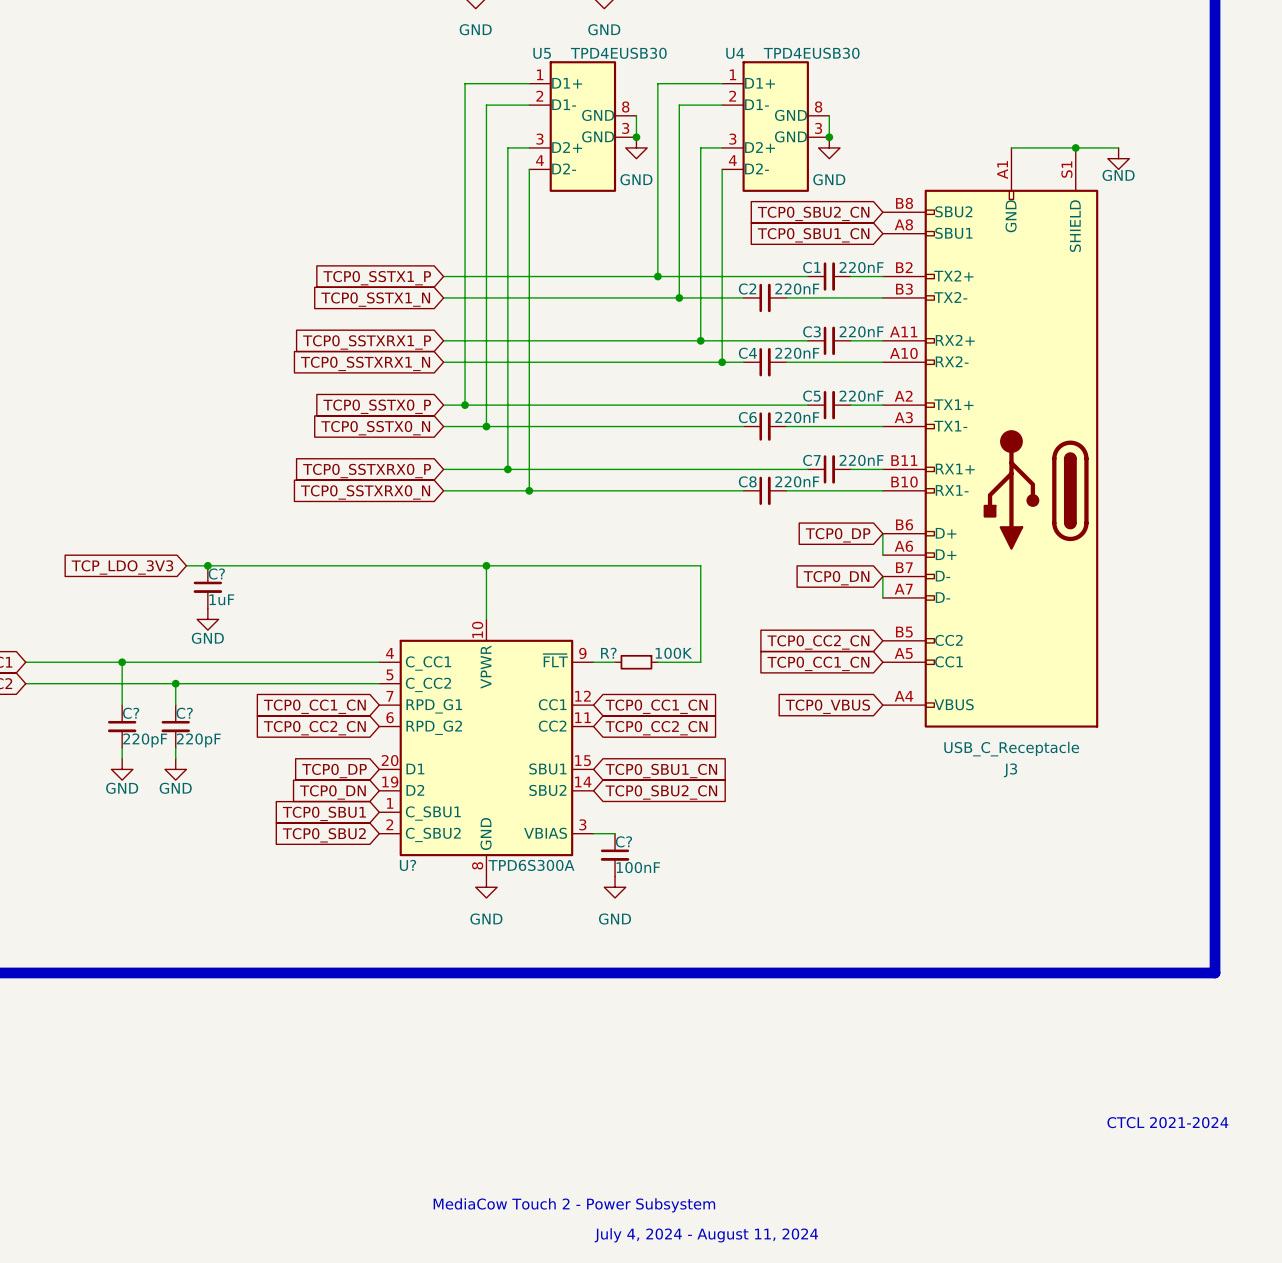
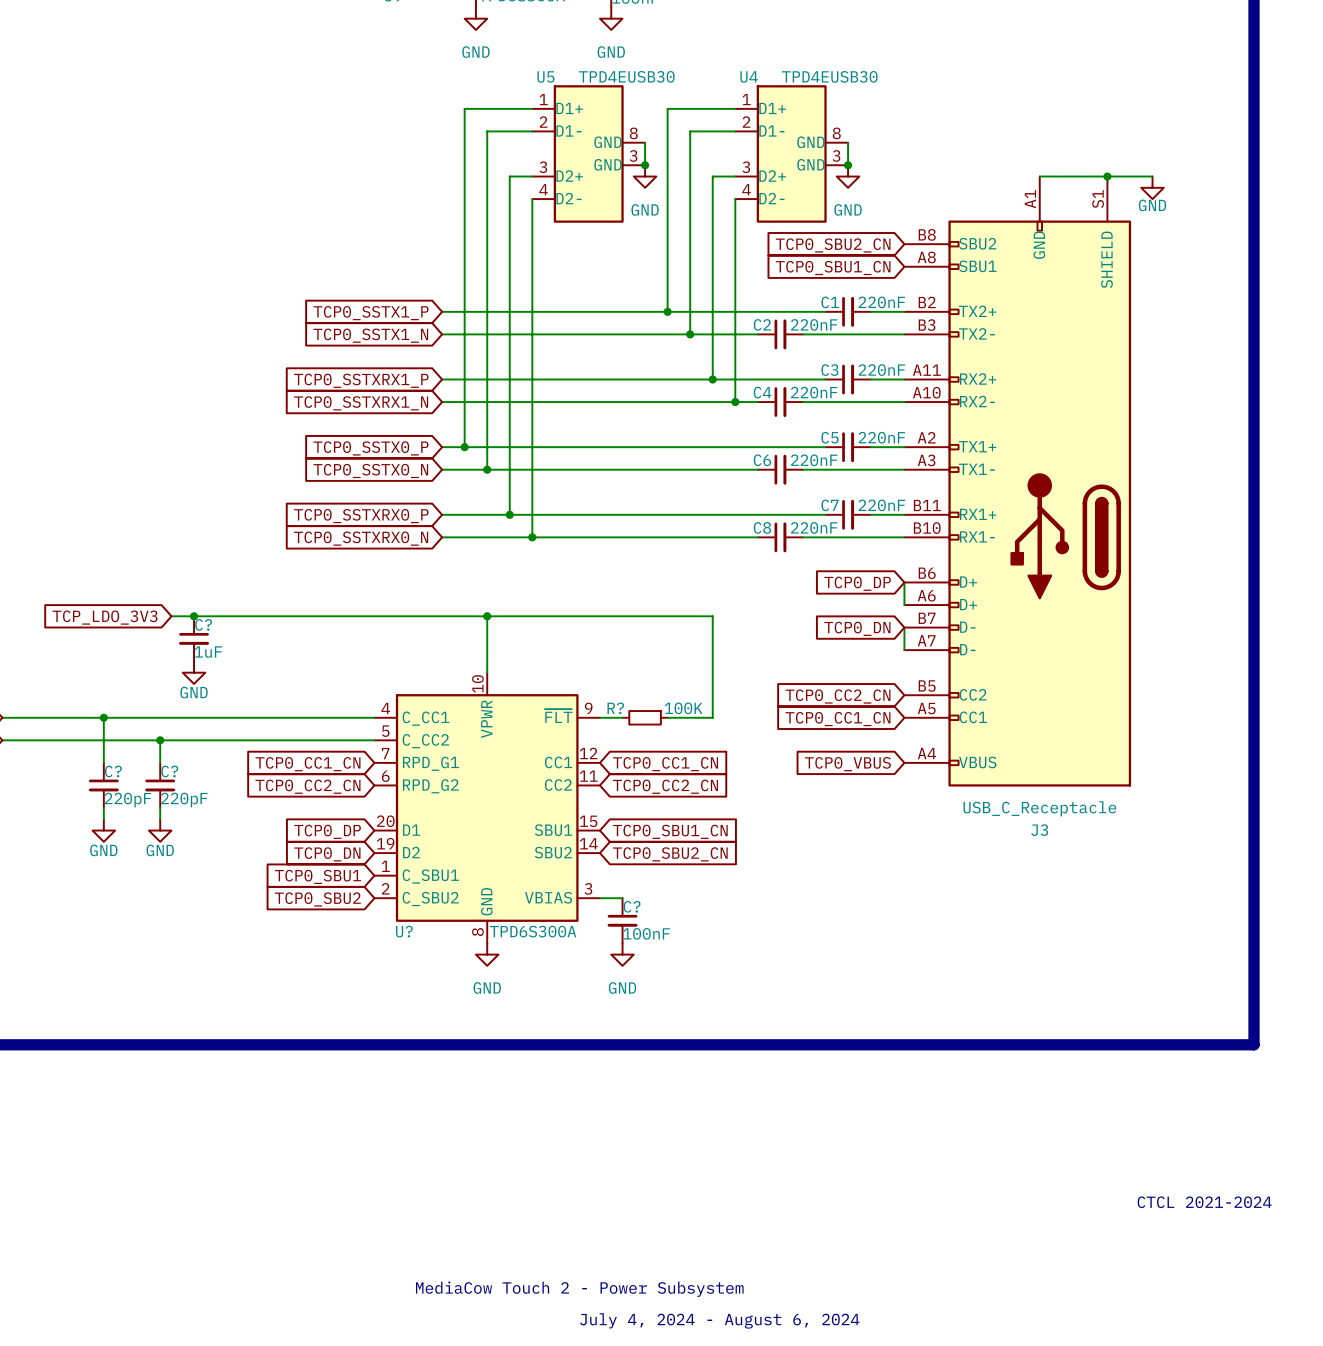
text: July 4, 2024 - August 11, 2024 (706, 1235) -> July 4, 2024 - August 6, 2024 (719, 1320)

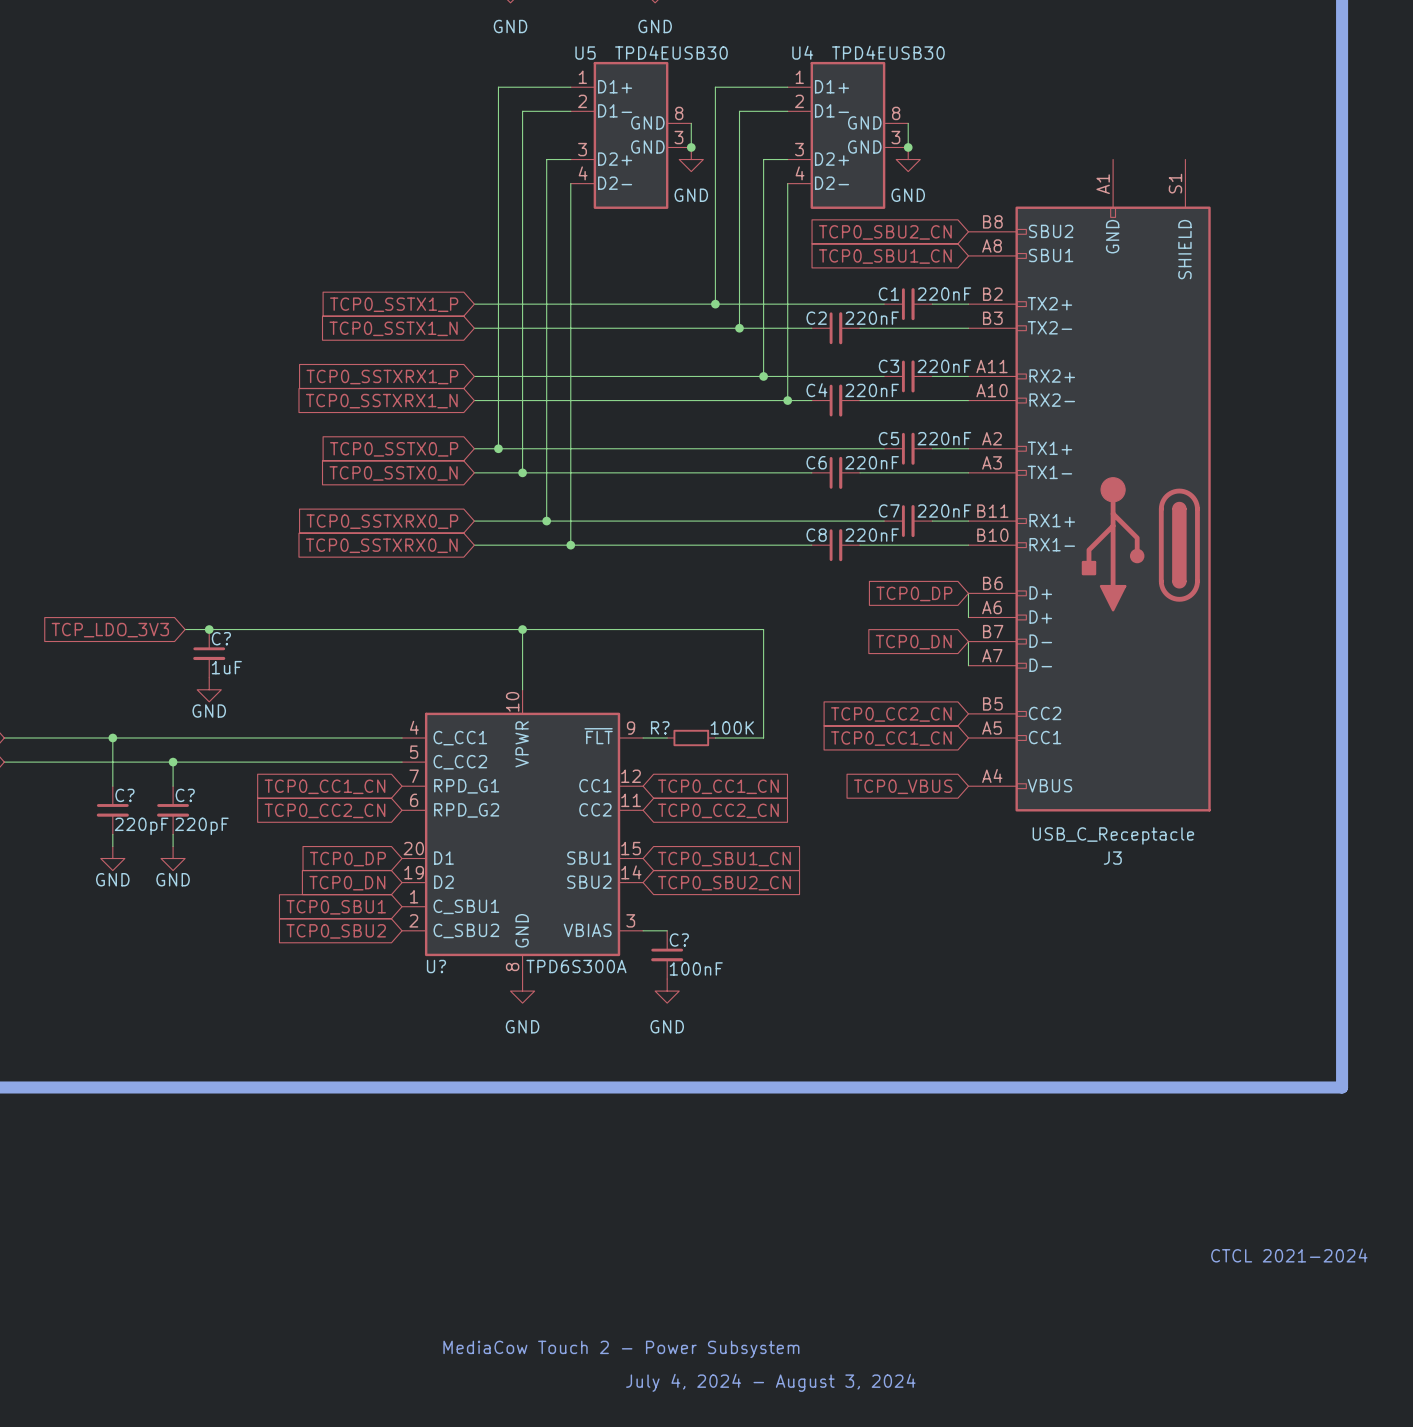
wire: (1039, 176) (1152, 176) -> none
junction: (1107, 176) -> none
power symbol: GND (1152, 187) -> none
text: July 4, 2024 - August 6, 2024 (719, 1320) -> July 4, 2024 - August 3, 2024 (770, 1382)

